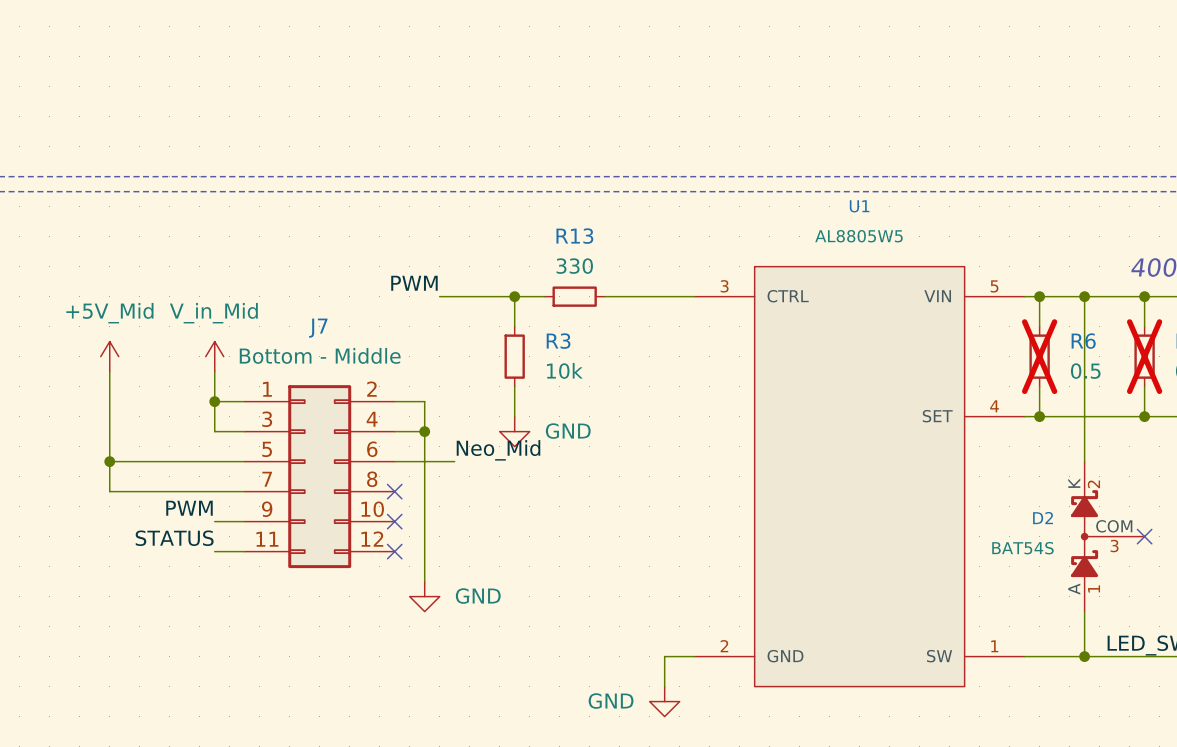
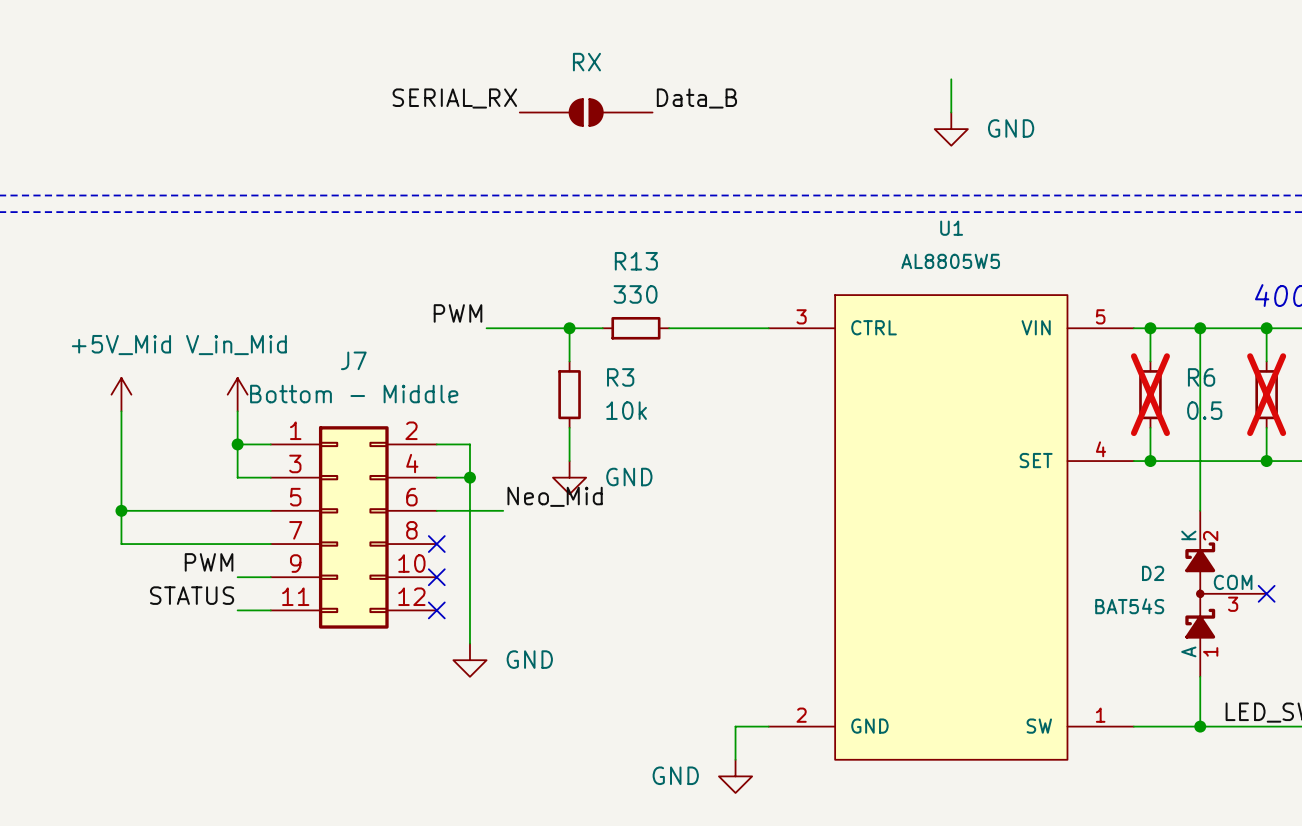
wire: none -> (951, 79) (951, 112)
label: none -> SERIAL_RX (454, 98)
label: none -> Data_B (696, 98)
part: none -> RX (586, 112)
power symbol: none -> GND (951, 129)

